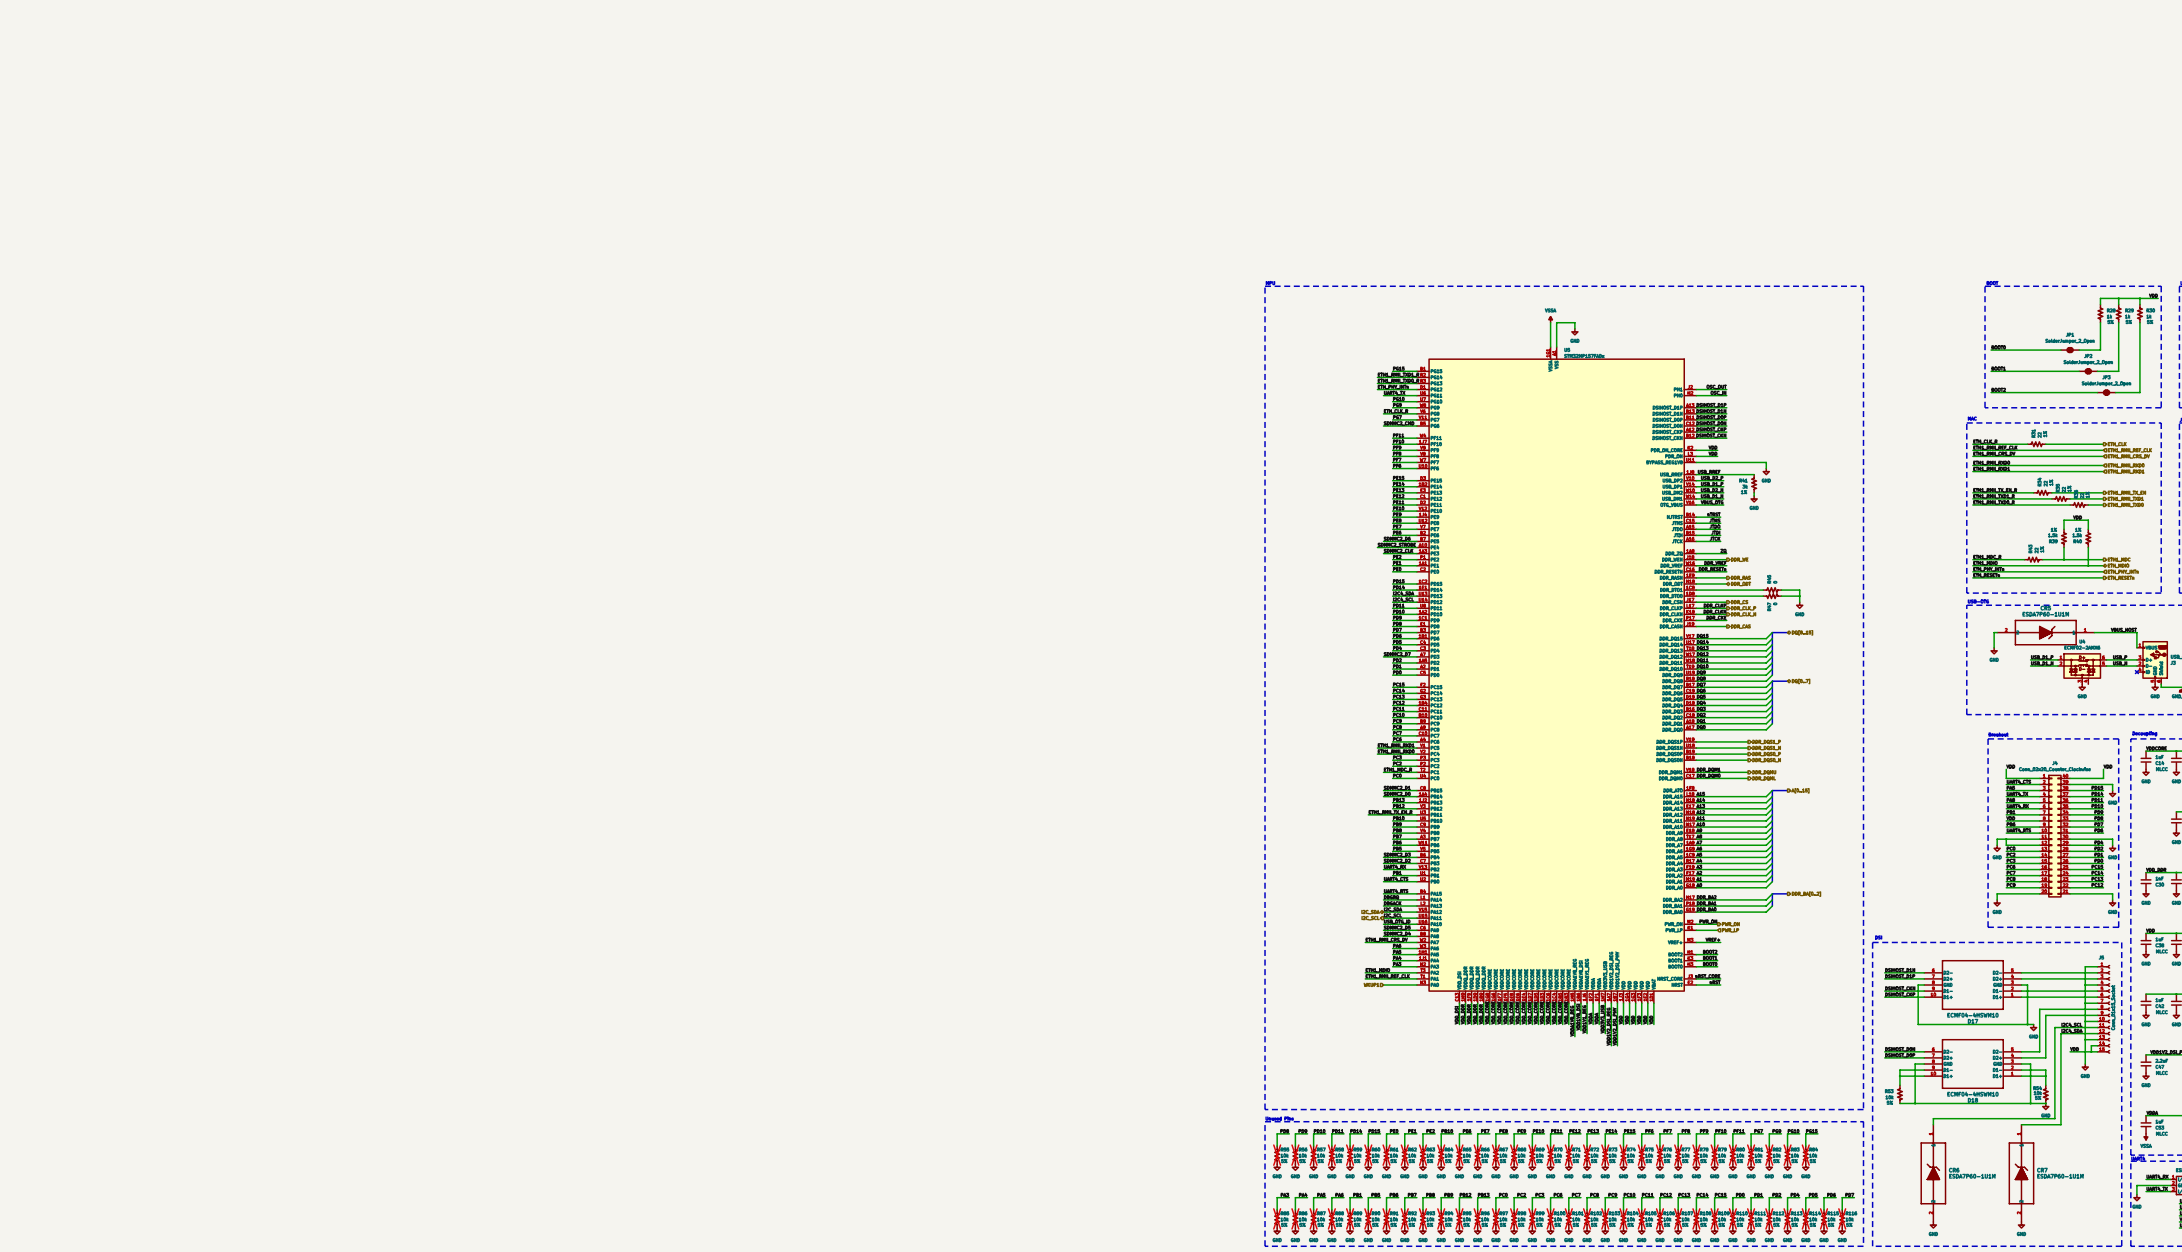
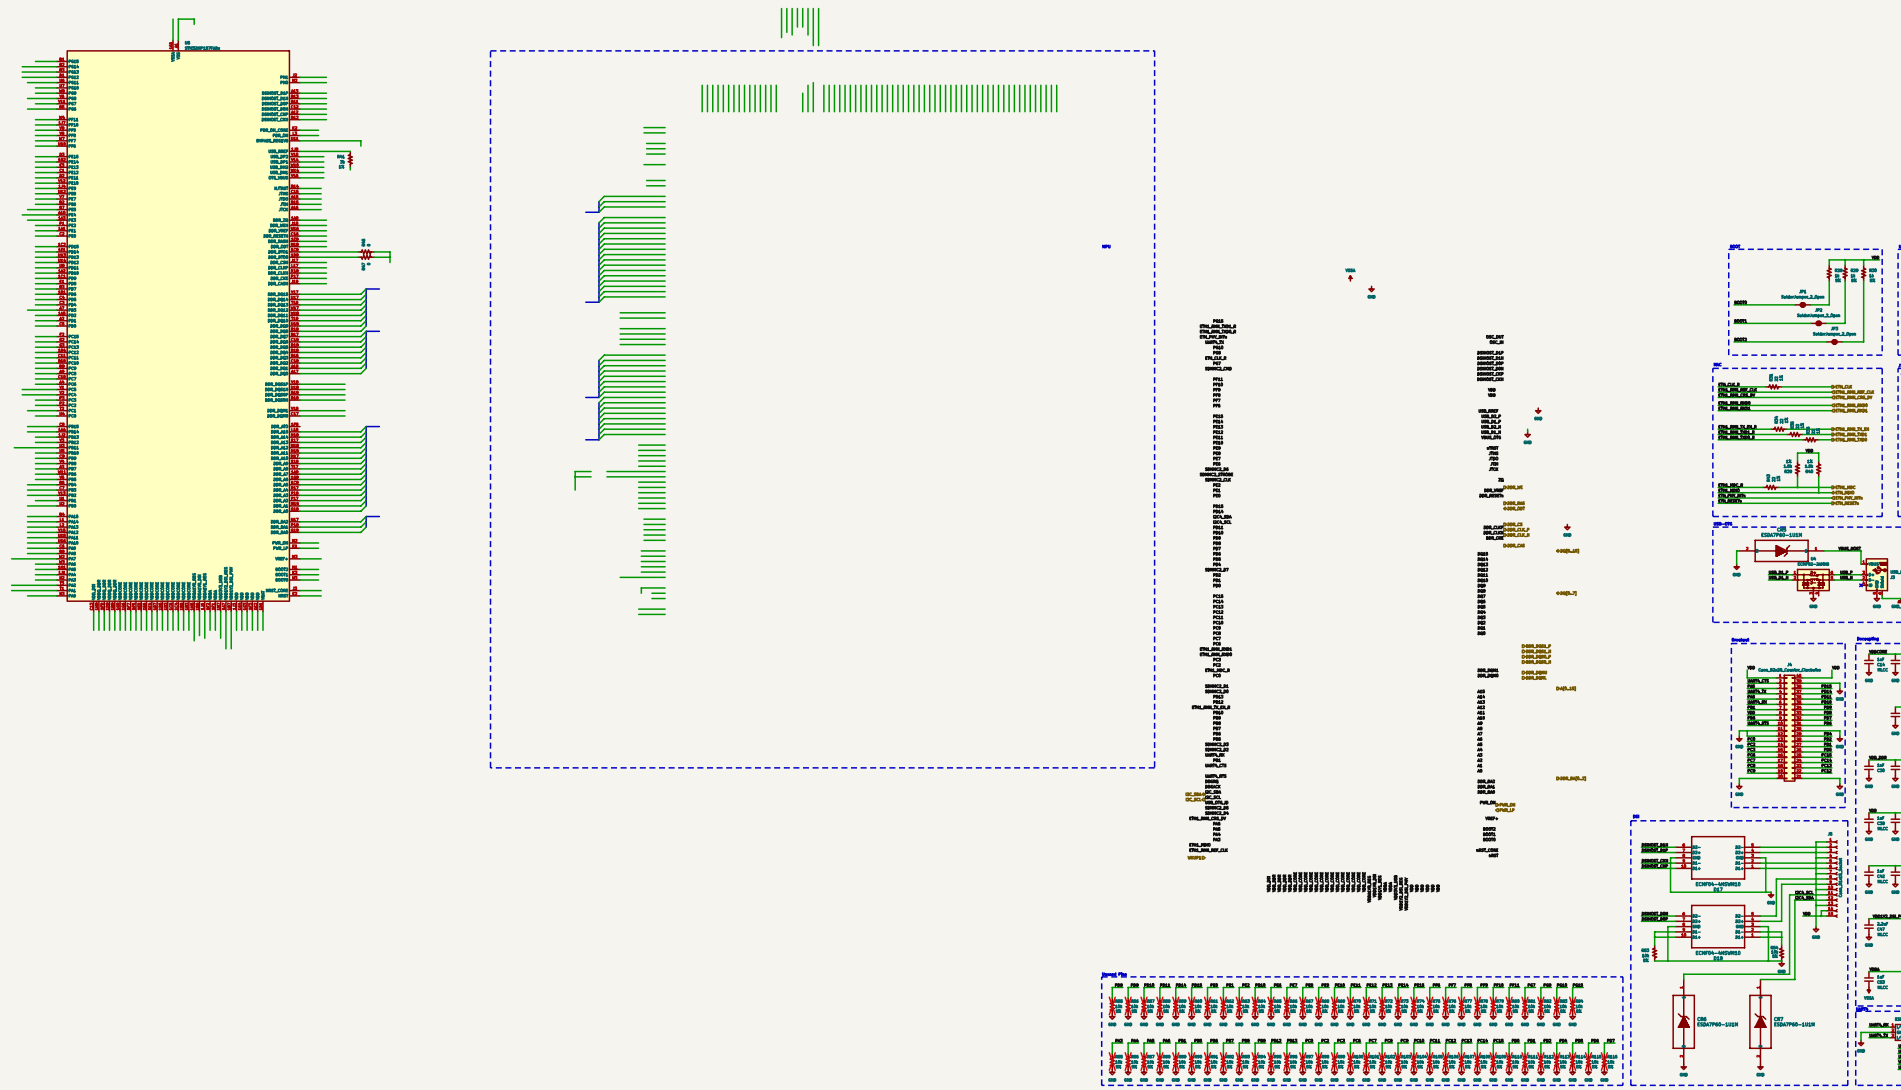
wire: none -> (781, 8) (781, 37)
wire: none -> (786, 8) (786, 32)
wire: none -> (792, 8) (792, 34)
wire: none -> (797, 8) (797, 27)
wire: none -> (802, 8) (802, 27)
wire: none -> (808, 8) (808, 34)
wire: none -> (813, 8) (813, 45)
wire: none -> (818, 8) (818, 45)
wire: none -> (173, 19) (173, 40)
wire: none -> (194, 24) (194, 19) (178, 19) (178, 40)
line: none -> (490, 50) (1154, 50) (1154, 767) (490, 767) (490, 50)
wire: none -> (35, 61) (56, 61)
wire: none -> (22, 66) (56, 66)
wire: none -> (22, 72) (56, 72)
wire: none -> (22, 77) (56, 77)
wire: none -> (300, 77) (326, 77)
wire: none -> (27, 82) (56, 82)
wire: none -> (300, 82) (326, 82)
wire: none -> (813, 82) (813, 111)
wire: none -> (702, 85) (702, 111)
wire: none -> (707, 85) (707, 111)
wire: none -> (712, 85) (712, 111)
wire: none -> (718, 85) (718, 111)
wire: none -> (723, 85) (723, 111)
wire: none -> (728, 85) (728, 111)
wire: none -> (733, 85) (733, 111)
wire: none -> (739, 85) (739, 111)
wire: none -> (744, 85) (744, 111)
wire: none -> (749, 85) (749, 111)
wire: none -> (755, 85) (755, 111)
wire: none -> (760, 85) (760, 111)
wire: none -> (765, 85) (765, 111)
wire: none -> (770, 85) (770, 111)
wire: none -> (776, 85) (776, 111)
wire: none -> (808, 85) (808, 111)
wire: none -> (823, 85) (823, 111)
wire: none -> (829, 85) (829, 111)
wire: none -> (834, 85) (834, 111)
wire: none -> (839, 85) (839, 111)
wire: none -> (845, 85) (845, 111)
wire: none -> (850, 85) (850, 111)
wire: none -> (855, 85) (855, 111)
wire: none -> (860, 85) (860, 111)
wire: none -> (866, 85) (866, 111)
wire: none -> (871, 85) (871, 111)
wire: none -> (876, 85) (876, 111)
wire: none -> (882, 85) (882, 111)
wire: none -> (887, 85) (887, 111)
wire: none -> (892, 85) (892, 111)
wire: none -> (897, 85) (897, 111)
wire: none -> (903, 85) (903, 111)
wire: none -> (908, 85) (908, 111)
wire: none -> (913, 85) (913, 111)
wire: none -> (919, 85) (919, 111)
wire: none -> (924, 85) (924, 111)
wire: none -> (929, 85) (929, 111)
wire: none -> (935, 85) (935, 111)
wire: none -> (940, 85) (940, 111)
wire: none -> (945, 85) (945, 111)
wire: none -> (950, 85) (950, 111)
wire: none -> (956, 85) (956, 111)
wire: none -> (961, 85) (961, 111)
wire: none -> (966, 85) (966, 111)
wire: none -> (972, 85) (972, 111)
wire: none -> (977, 85) (977, 111)
wire: none -> (982, 85) (982, 111)
wire: none -> (987, 85) (987, 111)
wire: none -> (993, 85) (993, 111)
wire: none -> (998, 85) (998, 111)
wire: none -> (1003, 85) (1003, 111)
wire: none -> (1009, 85) (1009, 111)
wire: none -> (1014, 85) (1014, 111)
wire: none -> (1019, 85) (1019, 111)
wire: none -> (1024, 85) (1024, 111)
wire: none -> (1030, 85) (1030, 111)
wire: none -> (1035, 85) (1035, 111)
wire: none -> (1040, 85) (1040, 111)
wire: none -> (1046, 85) (1046, 111)
wire: none -> (1051, 85) (1051, 111)
wire: none -> (1056, 85) (1056, 111)
wire: none -> (35, 87) (56, 87)
wire: none -> (35, 93) (56, 93)
wire: none -> (300, 93) (326, 93)
wire: none -> (802, 93) (802, 111)
wire: none -> (27, 98) (56, 98)
wire: none -> (300, 98) (326, 98)
wire: none -> (35, 103) (56, 103)
wire: none -> (300, 103) (326, 103)
wire: none -> (27, 109) (56, 109)
wire: none -> (300, 109) (326, 109)
wire: none -> (300, 114) (326, 114)
wire: none -> (35, 119) (56, 119)
wire: none -> (300, 119) (326, 119)
wire: none -> (35, 124) (56, 124)
wire: none -> (643, 127) (665, 127)
wire: none -> (35, 130) (56, 130)
wire: none -> (300, 130) (318, 130)
wire: none -> (643, 132) (665, 132)
wire: none -> (35, 135) (56, 135)
wire: none -> (300, 135) (318, 135)
wire: none -> (35, 140) (56, 140)
wire: none -> (300, 140) (360, 140) (360, 146)
wire: none -> (646, 143) (665, 143)
wire: none -> (35, 146) (56, 146)
wire: none -> (646, 148) (665, 148)
wire: none -> (300, 151) (350, 151)
wire: none -> (646, 154) (665, 154)
wire: none -> (35, 156) (56, 156)
wire: none -> (300, 156) (323, 156)
wire: none -> (35, 161) (56, 161)
wire: none -> (300, 161) (323, 161)
wire: none -> (643, 164) (665, 164)
wire: none -> (35, 167) (56, 167)
wire: none -> (300, 167) (323, 167)
wire: none -> (350, 167) (350, 169)
wire: none -> (35, 172) (56, 172)
wire: none -> (300, 172) (323, 172)
wire: none -> (35, 177) (56, 177)
wire: none -> (300, 177) (323, 177)
wire: none -> (646, 180) (665, 180)
wire: none -> (35, 183) (56, 183)
wire: none -> (646, 185) (665, 185)
wire: none -> (35, 188) (56, 188)
wire: none -> (300, 188) (321, 188)
wire: none -> (35, 193) (56, 193)
wire: none -> (300, 193) (321, 193)
wire: none -> (665, 196) (604, 196) (598, 201)
wire: none -> (35, 199) (56, 199)
wire: none -> (300, 199) (321, 199)
bus: none -> (598, 201) (598, 212) (585, 212)
wire: none -> (665, 201) (604, 201) (598, 206)
wire: none -> (35, 204) (56, 204)
wire: none -> (300, 204) (321, 204)
wire: none -> (665, 206) (604, 206) (598, 212)
wire: none -> (27, 209) (56, 209)
wire: none -> (300, 209) (321, 209)
wire: none -> (22, 214) (56, 214)
wire: none -> (665, 217) (604, 217) (598, 222)
wire: none -> (27, 220) (56, 220)
wire: none -> (300, 220) (326, 220)
bus: none -> (598, 222) (598, 302) (585, 302)
wire: none -> (665, 222) (604, 222) (598, 228)
wire: none -> (35, 225) (56, 225)
wire: none -> (300, 225) (326, 225)
wire: none -> (665, 228) (604, 228) (598, 233)
wire: none -> (35, 230) (56, 230)
wire: none -> (300, 230) (326, 230)
wire: none -> (665, 233) (604, 233) (598, 238)
wire: none -> (35, 236) (56, 236)
wire: none -> (300, 236) (326, 236)
wire: none -> (665, 238) (604, 238) (598, 244)
wire: none -> (300, 241) (326, 241)
wire: none -> (665, 244) (604, 244) (598, 249)
wire: none -> (35, 246) (56, 246)
wire: none -> (300, 246) (326, 246)
wire: none -> (665, 249) (604, 249) (598, 254)
line: (1265, 286) (1863, 286) (1863, 1109) (1265, 1109) (1265, 286) -> none
wire: none -> (35, 251) (56, 251)
wire: none -> (300, 251) (358, 251)
wire: none -> (374, 251) (389, 251) (389, 262)
wire: none -> (665, 254) (604, 254) (598, 259)
wire: none -> (35, 257) (56, 257)
wire: none -> (300, 257) (358, 257)
wire: none -> (374, 257) (389, 257)
wire: none -> (665, 259) (604, 259) (598, 265)
wire: none -> (35, 262) (56, 262)
wire: none -> (300, 262) (326, 262)
wire: none -> (665, 265) (604, 265) (598, 270)
wire: none -> (35, 267) (56, 267)
wire: none -> (300, 267) (326, 267)
wire: none -> (665, 270) (604, 270) (598, 275)
wire: none -> (35, 273) (56, 273)
wire: none -> (300, 273) (326, 273)
wire: none -> (665, 275) (604, 275) (598, 281)
wire: none -> (35, 278) (56, 278)
wire: none -> (300, 278) (326, 278)
wire: none -> (665, 281) (604, 281) (598, 286)
wire: (1550, 322) (1550, 347) -> none
wire: none -> (35, 283) (56, 283)
wire: none -> (300, 283) (326, 283)
wire: none -> (665, 286) (604, 286) (598, 291)
wire: (1574, 328) (1574, 322) (1556, 322) (1556, 347) -> none
wire: none -> (35, 288) (56, 288)
wire: none -> (366, 288) (360, 294) (300, 294)
bus: none -> (379, 288) (366, 288) (366, 326)
wire: none -> (665, 291) (604, 291) (598, 296)
wire: none -> (35, 294) (56, 294)
wire: none -> (366, 294) (360, 299) (300, 299)
wire: none -> (665, 296) (604, 296) (598, 302)
wire: none -> (35, 299) (56, 299)
wire: none -> (366, 299) (360, 304) (300, 304)
wire: none -> (35, 304) (56, 304)
wire: none -> (366, 304) (360, 310) (300, 310)
wire: none -> (27, 310) (56, 310)
wire: none -> (366, 310) (360, 315) (300, 315)
wire: none -> (620, 312) (665, 312)
wire: none -> (35, 315) (56, 315)
wire: none -> (366, 315) (360, 320) (300, 320)
wire: none -> (620, 318) (665, 318)
wire: none -> (35, 320) (56, 320)
wire: none -> (366, 320) (360, 326) (300, 326)
wire: (1392, 371) (1416, 371) -> none
wire: none -> (35, 326) (56, 326)
wire: none -> (366, 326) (360, 331) (300, 331)
wire: none -> (620, 328) (665, 328)
wire: (1377, 377) (1416, 377) -> none
wire: none -> (366, 331) (360, 336) (300, 336)
bus: none -> (379, 331) (366, 331) (366, 368)
wire: none -> (620, 333) (665, 333)
wire: (1377, 383) (1416, 383) -> none
wire: none -> (35, 336) (56, 336)
wire: none -> (366, 336) (360, 341) (300, 341)
wire: none -> (620, 339) (665, 339)
wire: (1377, 389) (1416, 389) -> none
wire: (1696, 389) (1726, 389) -> none
wire: none -> (35, 341) (56, 341)
wire: none -> (366, 341) (360, 347) (300, 347)
wire: none -> (620, 344) (665, 344)
wire: (1383, 395) (1416, 395) -> none
wire: (1696, 395) (1726, 395) -> none
wire: none -> (35, 347) (56, 347)
wire: none -> (366, 347) (360, 352) (300, 352)
wire: (1392, 401) (1416, 401) -> none
wire: none -> (35, 352) (56, 352)
wire: none -> (366, 352) (360, 357) (300, 357)
wire: none -> (665, 355) (604, 355) (598, 360)
wire: (1392, 407) (1416, 407) -> none
wire: (1696, 407) (1726, 407) -> none
wire: none -> (35, 357) (56, 357)
wire: none -> (366, 357) (360, 363) (300, 363)
bus: none -> (598, 360) (598, 397) (585, 397)
wire: none -> (665, 360) (604, 360) (598, 365)
wire: (1383, 413) (1416, 413) -> none
wire: (1696, 413) (1726, 413) -> none
wire: none -> (35, 363) (56, 363)
wire: none -> (366, 363) (360, 368) (300, 368)
wire: none -> (665, 365) (604, 365) (598, 371)
wire: (1392, 419) (1416, 419) -> none
wire: (1696, 419) (1726, 419) -> none
wire: none -> (35, 368) (56, 368)
wire: none -> (366, 368) (360, 373) (300, 373)
wire: none -> (665, 371) (604, 371) (598, 376)
wire: (1383, 426) (1416, 426) -> none
wire: (1696, 426) (1726, 426) -> none
wire: none -> (35, 373) (56, 373)
wire: none -> (665, 376) (604, 376) (598, 381)
wire: (1696, 432) (1726, 432) -> none
wire: none -> (35, 378) (56, 378)
wire: none -> (665, 381) (604, 381) (598, 386)
wire: (1392, 438) (1416, 438) -> none
wire: (1696, 438) (1726, 438) -> none
wire: none -> (35, 384) (56, 384)
wire: none -> (300, 384) (345, 384)
wire: none -> (665, 386) (604, 386) (598, 392)
wire: (1392, 444) (1416, 444) -> none
wire: none -> (22, 389) (56, 389)
wire: none -> (300, 389) (345, 389)
wire: none -> (665, 392) (604, 392) (598, 397)
wire: (1392, 450) (1416, 450) -> none
wire: (1696, 450) (1717, 450) -> none
wire: none -> (22, 394) (56, 394)
wire: none -> (300, 394) (345, 394)
wire: none -> (665, 397) (604, 397) (598, 402)
wire: (1392, 456) (1416, 456) -> none
wire: (1696, 456) (1717, 456) -> none
wire: none -> (35, 400) (56, 400)
wire: none -> (300, 400) (345, 400)
bus: none -> (598, 402) (598, 439) (585, 439)
wire: none -> (665, 402) (604, 402) (598, 408)
wire: (1392, 462) (1416, 462) -> none
wire: (1696, 462) (1766, 462) (1766, 468) -> none
wire: none -> (35, 405) (56, 405)
wire: none -> (665, 408) (604, 408) (598, 413)
wire: (1392, 468) (1416, 468) -> none
wire: none -> (27, 410) (56, 410)
wire: none -> (300, 410) (345, 410)
wire: none -> (665, 413) (604, 413) (598, 418)
wire: (1696, 474) (1754, 474) -> none
wire: none -> (35, 415) (56, 415)
wire: none -> (300, 415) (345, 415)
wire: none -> (665, 418) (604, 418) (598, 423)
wire: (1392, 480) (1416, 480) -> none
wire: (1696, 480) (1723, 480) -> none
part position: (1754, 483) -> (350, 159)
wire: none -> (665, 423) (604, 423) (598, 429)
wire: (1392, 486) (1416, 486) -> none
wire: (1696, 486) (1723, 486) -> none
wire: none -> (27, 426) (56, 426)
wire: none -> (366, 426) (360, 431) (300, 431)
bus: none -> (379, 426) (366, 426) (366, 505)
wire: none -> (665, 429) (604, 429) (598, 434)
wire: (1392, 492) (1416, 492) -> none
wire: (1696, 492) (1723, 492) -> none
wire: none -> (27, 431) (56, 431)
wire: none -> (366, 431) (360, 437) (300, 437)
wire: none -> (665, 434) (604, 434) (598, 439)
wire: (1392, 498) (1416, 498) -> none
wire: (1696, 498) (1723, 498) -> none
wire: none -> (35, 437) (56, 437)
wire: none -> (366, 437) (360, 442) (300, 442)
wire: (1392, 505) (1416, 505) -> none
wire: (1696, 505) (1723, 505) -> none
wire: none -> (35, 442) (56, 442)
wire: none -> (366, 442) (360, 447) (300, 447)
wire: none -> (638, 445) (665, 445)
wire: (1392, 511) (1416, 511) -> none
wire: none -> (14, 447) (56, 447)
wire: none -> (366, 447) (360, 453) (300, 453)
wire: none -> (638, 450) (665, 450)
wire: (1392, 517) (1416, 517) -> none
wire: (1696, 517) (1720, 517) -> none
wire: none -> (35, 453) (56, 453)
wire: none -> (366, 453) (360, 458) (300, 458)
wire: none -> (638, 455) (665, 455)
wire: (1392, 523) (1416, 523) -> none
wire: (1696, 523) (1720, 523) -> none
wire: none -> (35, 458) (56, 458)
wire: none -> (366, 458) (360, 463) (300, 463)
wire: none -> (638, 460) (665, 460)
wire: (1392, 529) (1416, 529) -> none
wire: (1696, 529) (1720, 529) -> none
wire: none -> (35, 463) (56, 463)
wire: none -> (366, 463) (360, 468) (300, 468)
wire: none -> (638, 466) (665, 466)
wire: (1392, 535) (1416, 535) -> none
wire: (1696, 535) (1720, 535) -> none
wire: none -> (35, 468) (56, 468)
wire: none -> (366, 468) (360, 474) (300, 474)
wire: none -> (591, 471) (575, 471) (575, 490)
wire: none -> (606, 471) (665, 471)
wire: (1383, 541) (1416, 541) -> none
wire: (1696, 541) (1720, 541) -> none
wire: none -> (35, 474) (56, 474)
wire: none -> (366, 474) (360, 479) (300, 479)
wire: none -> (575, 476) (591, 476)
wire: none -> (606, 476) (665, 476)
wire: (1377, 547) (1416, 547) -> none
wire: none -> (35, 479) (56, 479)
wire: none -> (366, 479) (360, 484) (300, 484)
wire: none -> (638, 482) (665, 482)
wire: (1383, 553) (1416, 553) -> none
wire: (1696, 553) (1726, 553) -> none
wire: none -> (27, 484) (56, 484)
wire: none -> (366, 484) (360, 490) (300, 490)
wire: none -> (638, 487) (665, 487)
wire: (1392, 559) (1416, 559) -> none
wire: (1696, 559) (1726, 559) -> none
wire: none -> (27, 490) (56, 490)
wire: none -> (366, 490) (360, 495) (300, 495)
wire: none -> (638, 492) (665, 492)
wire: (1392, 565) (1416, 565) -> none
wire: (1696, 565) (1726, 565) -> none
wire: none -> (27, 495) (56, 495)
wire: none -> (366, 495) (360, 500) (300, 500)
wire: none -> (638, 498) (665, 498)
wire: (1392, 571) (1416, 571) -> none
wire: (1696, 571) (1726, 571) -> none
wire: none -> (35, 500) (56, 500)
wire: none -> (366, 500) (360, 505) (300, 505)
wire: none -> (638, 503) (665, 503)
wire: (1696, 577) (1726, 577) -> none
wire: none -> (27, 505) (56, 505)
wire: none -> (366, 505) (360, 511) (300, 511)
wire: none -> (638, 508) (665, 508)
wire: (1392, 583) (1416, 583) -> none
wire: (1696, 583) (1726, 583) -> none
wire: (1392, 590) (1416, 590) -> none
wire: (1696, 590) (1763, 590) -> none
part position: (1772, 590) -> (366, 251)
wire: (1781, 590) (1799, 590) (1799, 602) -> none
wire: none -> (27, 516) (56, 516)
wire: none -> (366, 516) (360, 521) (300, 521)
bus: none -> (379, 516) (366, 516) (366, 527)
wire: none -> (643, 519) (665, 519)
wire: (1392, 596) (1416, 596) -> none
wire: (1696, 596) (1763, 596) -> none
part position: (1772, 596) -> (366, 257)
wire: (1781, 596) (1799, 596) -> none
wire: none -> (27, 521) (56, 521)
wire: none -> (366, 521) (360, 527) (300, 527)
wire: none -> (643, 524) (665, 524)
wire: (1392, 602) (1416, 602) -> none
wire: (1696, 602) (1726, 602) -> none
wire: none -> (27, 527) (56, 527)
wire: none -> (366, 527) (360, 532) (300, 532)
wire: none -> (643, 529) (665, 529)
wire: (1392, 608) (1416, 608) -> none
wire: (1696, 608) (1726, 608) -> none
wire: none -> (27, 532) (56, 532)
wire: none -> (643, 535) (665, 535)
wire: (1392, 614) (1416, 614) -> none
wire: (1696, 614) (1726, 614) -> none
wire: none -> (27, 537) (56, 537)
wire: none -> (643, 540) (665, 540)
wire: (1392, 620) (1416, 620) -> none
wire: (1696, 620) (1726, 620) -> none
wire: none -> (27, 542) (56, 542)
wire: none -> (300, 542) (318, 542)
wire: (1392, 626) (1416, 626) -> none
wire: (1696, 626) (1726, 626) -> none
wire: none -> (27, 548) (56, 548)
wire: none -> (300, 548) (318, 548)
wire: none -> (641, 550) (665, 550)
wire: (1392, 632) (1416, 632) -> none
wire: (1772, 632) (1766, 638) (1696, 638) -> none
bus: (1787, 632) (1772, 632) (1772, 675) -> none
wire: none -> (27, 553) (56, 553)
wire: none -> (641, 556) (665, 556)
wire: (1392, 638) (1416, 638) -> none
wire: (1772, 638) (1766, 644) (1696, 644) -> none
wire: none -> (11, 558) (56, 558)
wire: none -> (300, 558) (321, 558)
wire: none -> (641, 561) (665, 561)
wire: (1392, 644) (1416, 644) -> none
wire: (1772, 644) (1766, 650) (1696, 650) -> none
wire: none -> (35, 564) (56, 564)
wire: none -> (641, 566) (665, 566)
wire: (1392, 650) (1416, 650) -> none
wire: (1772, 650) (1766, 656) (1696, 656) -> none
wire: none -> (35, 569) (56, 569)
wire: none -> (300, 569) (318, 569)
wire: none -> (641, 572) (665, 572)
wire: (1383, 656) (1416, 656) -> none
wire: (1772, 656) (1766, 662) (1696, 662) -> none
wire: none -> (35, 574) (56, 574)
wire: none -> (300, 574) (318, 574)
wire: none -> (620, 577) (665, 577)
wire: (1392, 662) (1416, 662) -> none
wire: (1772, 662) (1766, 669) (1696, 669) -> none
wire: none -> (35, 580) (56, 580)
wire: none -> (300, 580) (318, 580)
wire: (1392, 669) (1416, 669) -> none
wire: (1772, 669) (1766, 675) (1696, 675) -> none
wire: none -> (11, 585) (56, 585)
wire: none -> (665, 587) (641, 587) (641, 593)
wire: (1392, 675) (1416, 675) -> none
part position: (1556, 675) -> (178, 326)
wire: (1772, 675) (1766, 681) (1696, 681) -> none
wire: none -> (11, 590) (56, 590)
wire: none -> (300, 590) (321, 590)
wire: none -> (651, 593) (665, 593)
wire: (1772, 681) (1766, 687) (1696, 687) -> none
bus: (1787, 681) (1772, 681) (1772, 723) -> none
wire: none -> (27, 595) (56, 595)
wire: none -> (300, 595) (321, 595)
wire: none -> (651, 598) (665, 598)
wire: (1392, 687) (1416, 687) -> none
wire: (1772, 687) (1766, 693) (1696, 693) -> none
wire: (1392, 693) (1416, 693) -> none
wire: (1772, 693) (1766, 699) (1696, 699) -> none
wire: none -> (638, 609) (665, 609)
wire: (1392, 699) (1416, 699) -> none
wire: (1772, 699) (1766, 705) (1696, 705) -> none
wire: none -> (93, 611) (93, 630)
wire: none -> (98, 611) (98, 630)
wire: none -> (104, 611) (104, 630)
wire: none -> (109, 611) (109, 630)
wire: none -> (114, 611) (114, 630)
wire: none -> (120, 611) (120, 630)
wire: none -> (125, 611) (125, 630)
wire: none -> (130, 611) (130, 630)
wire: none -> (135, 611) (135, 630)
wire: none -> (141, 611) (141, 630)
wire: none -> (146, 611) (146, 630)
wire: none -> (151, 611) (151, 630)
wire: none -> (157, 611) (157, 630)
wire: none -> (162, 611) (162, 630)
wire: none -> (167, 611) (167, 630)
wire: none -> (173, 611) (173, 630)
wire: none -> (178, 611) (178, 630)
wire: none -> (183, 611) (183, 630)
wire: none -> (188, 611) (188, 630)
wire: none -> (194, 611) (194, 640)
wire: none -> (199, 611) (199, 635)
wire: none -> (204, 611) (204, 638)
wire: none -> (210, 611) (210, 630)
wire: none -> (215, 611) (215, 630)
wire: none -> (220, 611) (220, 638)
wire: none -> (225, 611) (225, 648)
wire: none -> (231, 611) (231, 648)
wire: none -> (236, 611) (236, 630)
wire: none -> (241, 611) (241, 630)
wire: none -> (247, 611) (247, 630)
wire: none -> (252, 611) (252, 630)
wire: none -> (257, 611) (257, 630)
wire: none -> (262, 611) (262, 630)
wire: none -> (638, 614) (665, 614)
wire: (1392, 705) (1416, 705) -> none
wire: (1772, 705) (1766, 711) (1696, 711) -> none
wire: (1392, 711) (1416, 711) -> none
wire: (1772, 711) (1766, 717) (1696, 717) -> none
wire: (1392, 717) (1416, 717) -> none
wire: (1772, 717) (1766, 723) (1696, 723) -> none
wire: (1392, 723) (1416, 723) -> none
wire: (1772, 723) (1766, 729) (1696, 729) -> none
wire: (1392, 729) (1416, 729) -> none
wire: (1392, 735) (1416, 735) -> none
wire: (1392, 741) (1416, 741) -> none
wire: (1696, 741) (1748, 741) -> none
wire: (1377, 748) (1416, 748) -> none
wire: (1696, 748) (1748, 748) -> none
wire: (1377, 754) (1416, 754) -> none
wire: (1696, 754) (1748, 754) -> none
wire: (1392, 760) (1416, 760) -> none
wire: (1696, 760) (1748, 760) -> none
wire: (1392, 766) (1416, 766) -> none
wire: (1383, 772) (1416, 772) -> none
wire: (1696, 772) (1748, 772) -> none
wire: (1392, 778) (1416, 778) -> none
wire: (1696, 778) (1748, 778) -> none
wire: (1383, 790) (1416, 790) -> none
wire: (1772, 790) (1766, 796) (1696, 796) -> none
bus: (1787, 790) (1772, 790) (1772, 881) -> none
wire: (1383, 796) (1416, 796) -> none
wire: (1772, 796) (1766, 802) (1696, 802) -> none
wire: (1392, 802) (1416, 802) -> none
wire: (1772, 802) (1766, 808) (1696, 808) -> none
wire: (1392, 808) (1416, 808) -> none
wire: (1772, 808) (1766, 814) (1696, 814) -> none
wire: (1368, 814) (1416, 814) -> none
wire: (1772, 814) (1766, 820) (1696, 820) -> none
wire: (1392, 820) (1416, 820) -> none
wire: (1772, 820) (1766, 827) (1696, 827) -> none
wire: (1392, 827) (1416, 827) -> none
wire: (1772, 827) (1766, 833) (1696, 833) -> none
wire: (1392, 833) (1416, 833) -> none
wire: (1772, 833) (1766, 839) (1696, 839) -> none
wire: (1392, 839) (1416, 839) -> none
wire: (1772, 839) (1766, 845) (1696, 845) -> none
wire: (1392, 845) (1416, 845) -> none
wire: (1772, 845) (1766, 851) (1696, 851) -> none
wire: (1392, 851) (1416, 851) -> none
wire: (1772, 851) (1766, 857) (1696, 857) -> none
wire: (1383, 857) (1416, 857) -> none
wire: (1772, 857) (1766, 863) (1696, 863) -> none
wire: (1383, 863) (1416, 863) -> none
wire: (1772, 863) (1766, 869) (1696, 869) -> none
wire: (1383, 869) (1416, 869) -> none
wire: (1772, 869) (1766, 875) (1696, 875) -> none
wire: (1392, 875) (1416, 875) -> none
wire: (1772, 875) (1766, 881) (1696, 881) -> none
wire: (1383, 881) (1416, 881) -> none
wire: (1772, 881) (1766, 887) (1696, 887) -> none
wire: (1383, 893) (1416, 893) -> none
wire: (1772, 893) (1766, 899) (1696, 899) -> none
bus: (1787, 893) (1772, 893) (1772, 906) -> none
wire: (1383, 899) (1416, 899) -> none
wire: (1772, 899) (1766, 906) (1696, 906) -> none
wire: (1383, 906) (1416, 906) -> none
wire: (1772, 906) (1766, 912) (1696, 912) -> none
wire: (1383, 912) (1416, 912) -> none
wire: (1383, 918) (1416, 918) -> none
wire: (1383, 924) (1416, 924) -> none
wire: (1696, 924) (1717, 924) -> none
wire: (1383, 930) (1416, 930) -> none
wire: (1696, 930) (1717, 930) -> none
wire: (1383, 936) (1416, 936) -> none
wire: (1365, 942) (1416, 942) -> none
wire: (1696, 942) (1720, 942) -> none
wire: (1392, 948) (1416, 948) -> none
wire: (1392, 954) (1416, 954) -> none
wire: (1696, 954) (1717, 954) -> none
wire: (1392, 960) (1416, 960) -> none
wire: (1696, 960) (1717, 960) -> none
wire: (1392, 966) (1416, 966) -> none
wire: (1696, 966) (1717, 966) -> none
wire: (1365, 972) (1416, 972) -> none
wire: (1365, 978) (1416, 978) -> none
wire: (1696, 978) (1720, 978) -> none
wire: (1383, 985) (1416, 985) -> none
wire: (1696, 985) (1720, 985) -> none
wire: (1459, 1003) (1459, 1024) -> none
wire: (1465, 1003) (1465, 1024) -> none
wire: (1471, 1003) (1471, 1024) -> none
wire: (1477, 1003) (1477, 1024) -> none
wire: (1483, 1003) (1483, 1024) -> none
wire: (1489, 1003) (1489, 1024) -> none
wire: (1495, 1003) (1495, 1024) -> none
wire: (1501, 1003) (1501, 1024) -> none
wire: (1508, 1003) (1508, 1024) -> none
wire: (1514, 1003) (1514, 1024) -> none
wire: (1520, 1003) (1520, 1024) -> none
wire: (1526, 1003) (1526, 1024) -> none
wire: (1532, 1003) (1532, 1024) -> none
wire: (1538, 1003) (1538, 1024) -> none
wire: (1544, 1003) (1544, 1024) -> none
wire: (1550, 1003) (1550, 1024) -> none
wire: (1556, 1003) (1556, 1024) -> none
wire: (1562, 1003) (1562, 1024) -> none
wire: (1568, 1003) (1568, 1024) -> none
wire: (1574, 1003) (1574, 1036) -> none
wire: (1580, 1003) (1580, 1030) -> none
wire: (1587, 1003) (1587, 1033) -> none
wire: (1593, 1003) (1593, 1024) -> none
wire: (1599, 1003) (1599, 1024) -> none
wire: (1605, 1003) (1605, 1033) -> none
wire: (1611, 1003) (1611, 1045) -> none
wire: (1617, 1003) (1617, 1045) -> none
wire: (1623, 1003) (1623, 1024) -> none
wire: (1629, 1003) (1629, 1024) -> none
wire: (1635, 1003) (1635, 1024) -> none
wire: (1641, 1003) (1641, 1024) -> none
wire: (1647, 1003) (1647, 1024) -> none
wire: (1653, 1003) (1653, 1024) -> none

